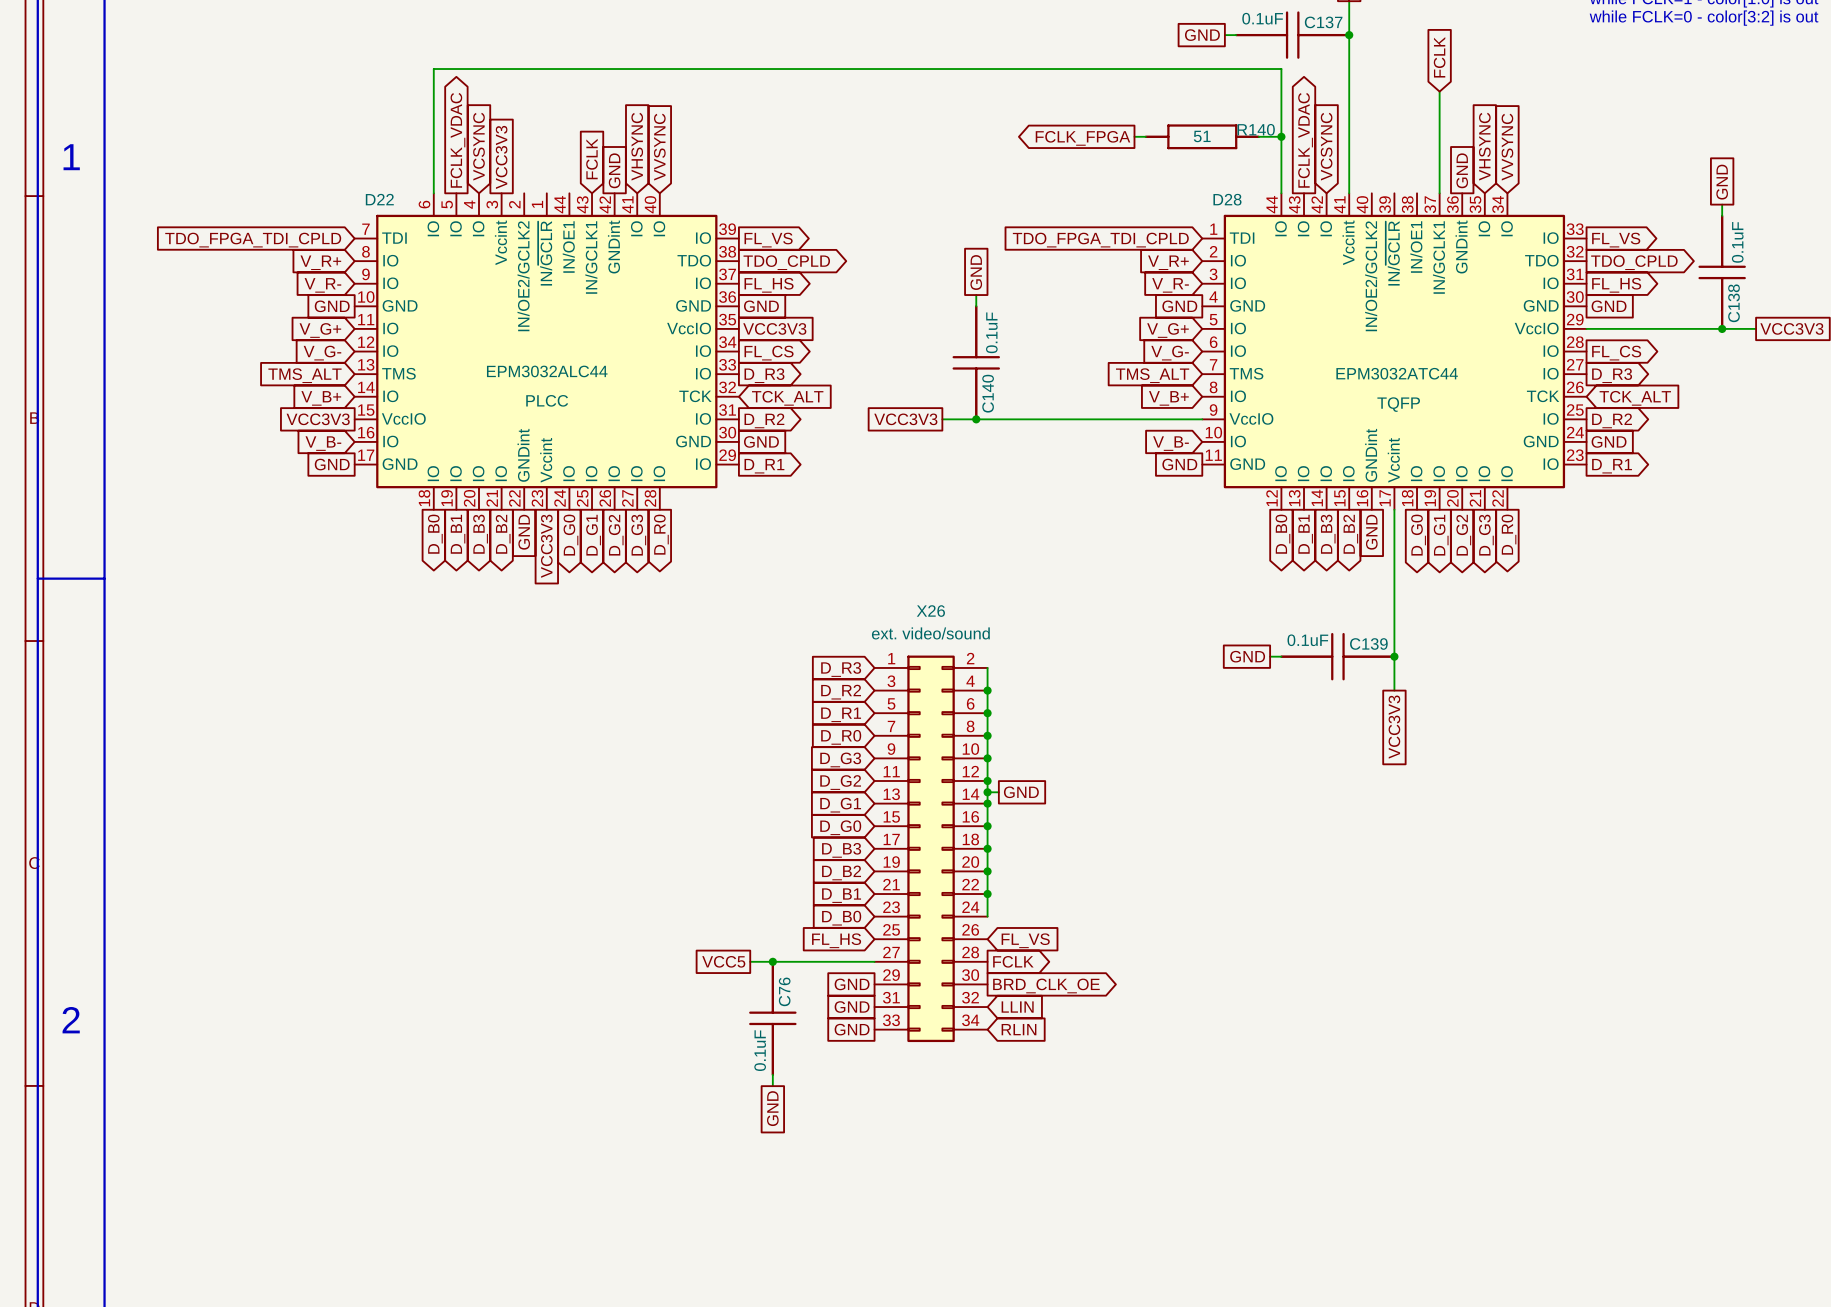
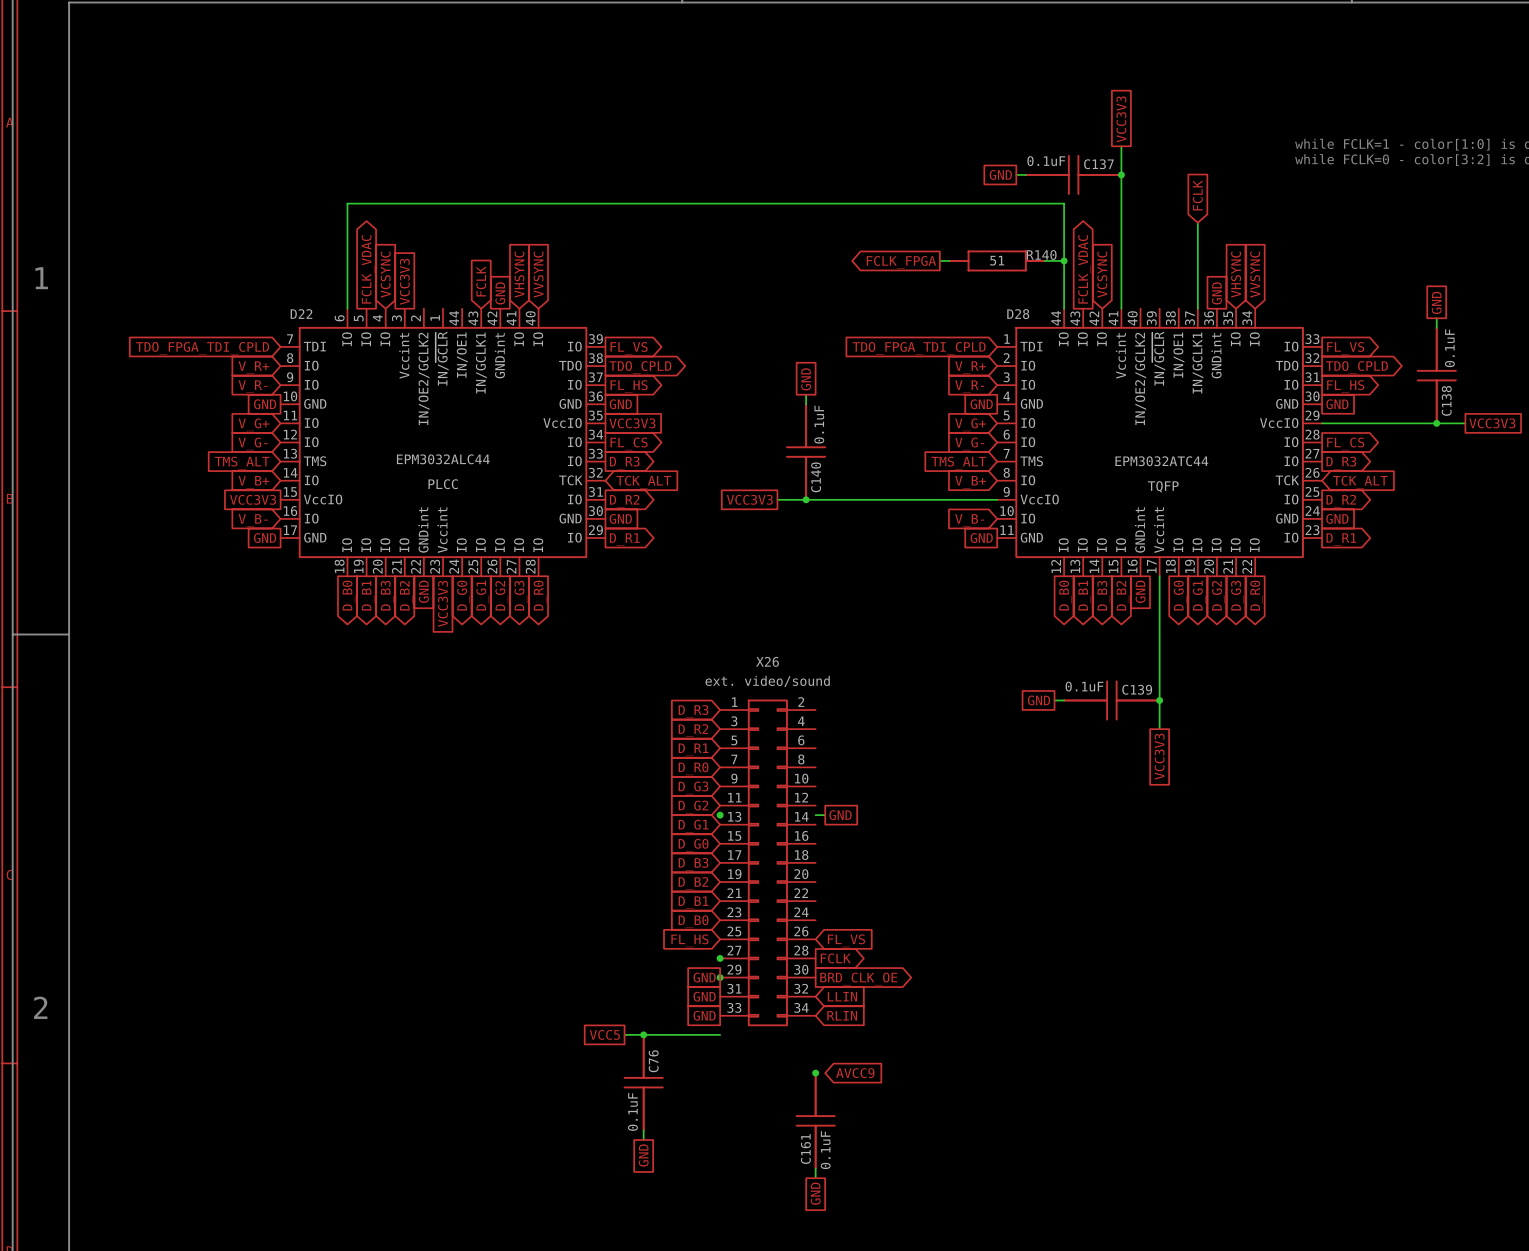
wire: (987, 667) (987, 916) -> none
junction: (987, 690) -> none
junction: (987, 713) -> none
junction: (987, 735) -> none
junction: (987, 758) -> none
junction: (987, 780) -> none
junction: none -> (720, 815)
junction: (987, 792) -> none
junction: (987, 803) -> none
junction: (987, 826) -> none
junction: (987, 848) -> none
junction: (987, 871) -> none
junction: (987, 894) -> none
global label position: VCC5 (723, 961) -> VCC5 (604, 1034)
wire: (750, 961) (874, 961) -> none
junction: (772, 961) -> none
junction: none -> (720, 958)
junction: none -> (720, 977)
C76 position: (772, 1018) -> (643, 1082)
wire: none -> (624, 1034) (720, 1034)
junction: none -> (643, 1034)
wire: (772, 1074) (772, 1086) -> (643, 1130) (643, 1139)
junction: none -> (815, 1073)
global label: none -> AVCC9 (855, 1073)
global label position: GND (772, 1108) -> GND (643, 1155)
C161: none -> 0.1uF (815, 1120)
wire: none -> (815, 1168) (815, 1178)
global label: none -> GND (815, 1193)

